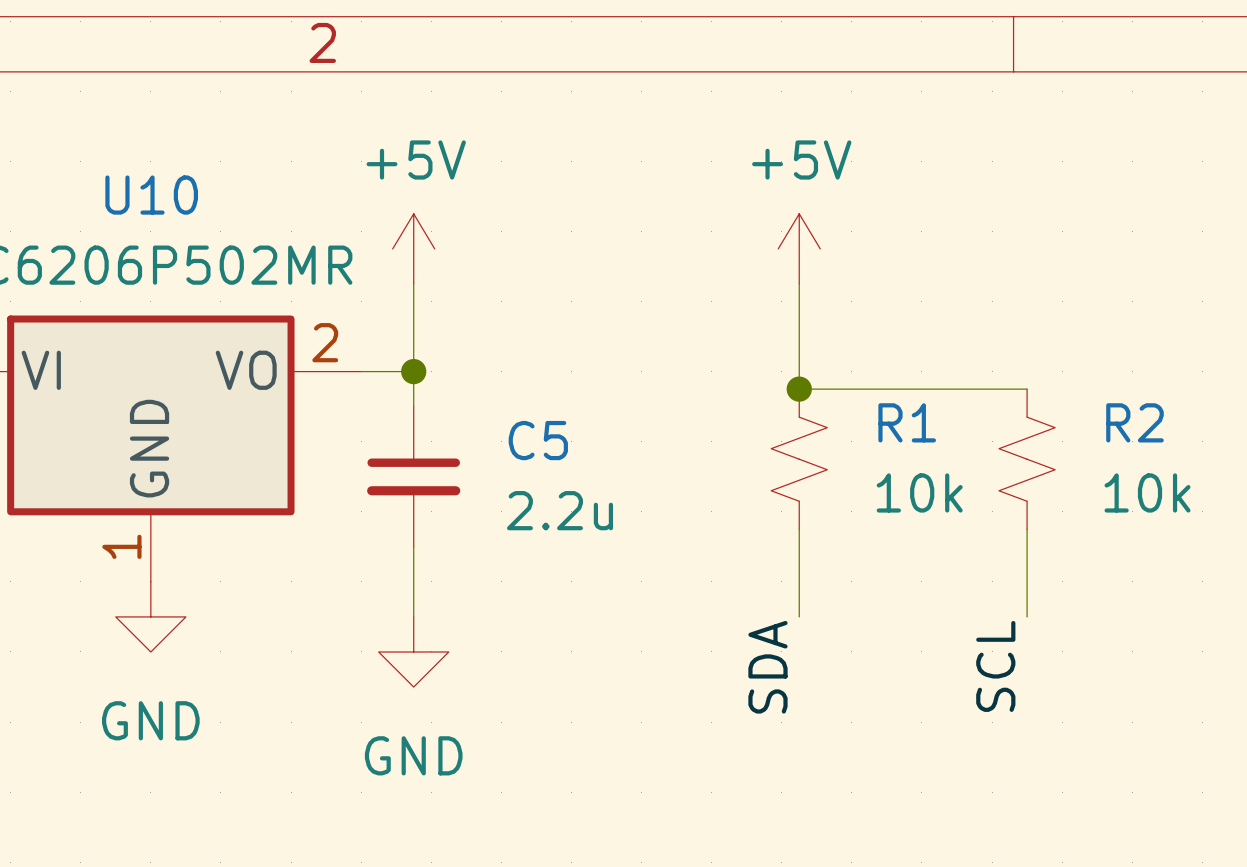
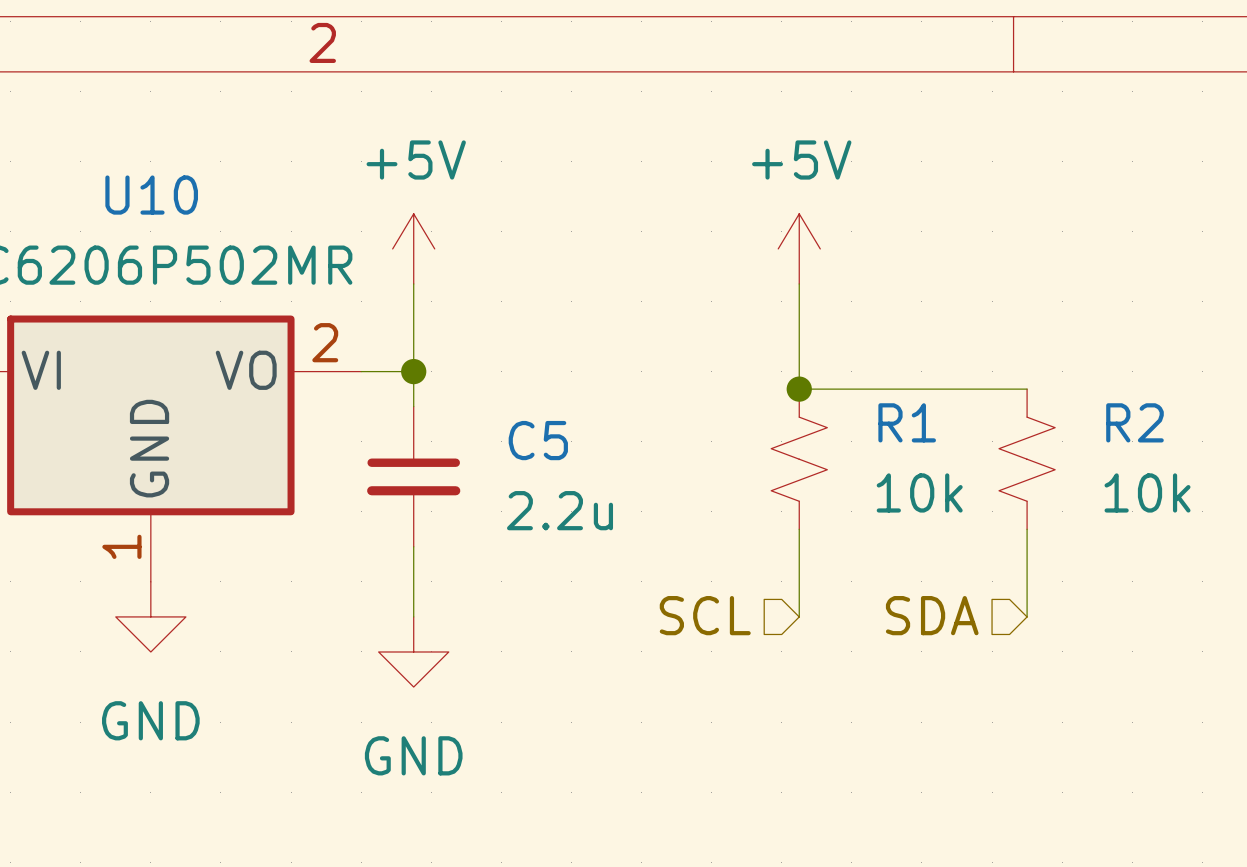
hierarchical label: none -> SCL (705, 615)
hierarchical label: none -> SDA (932, 615)
label: SCL (995, 666) -> none
label: SDA (767, 667) -> none

